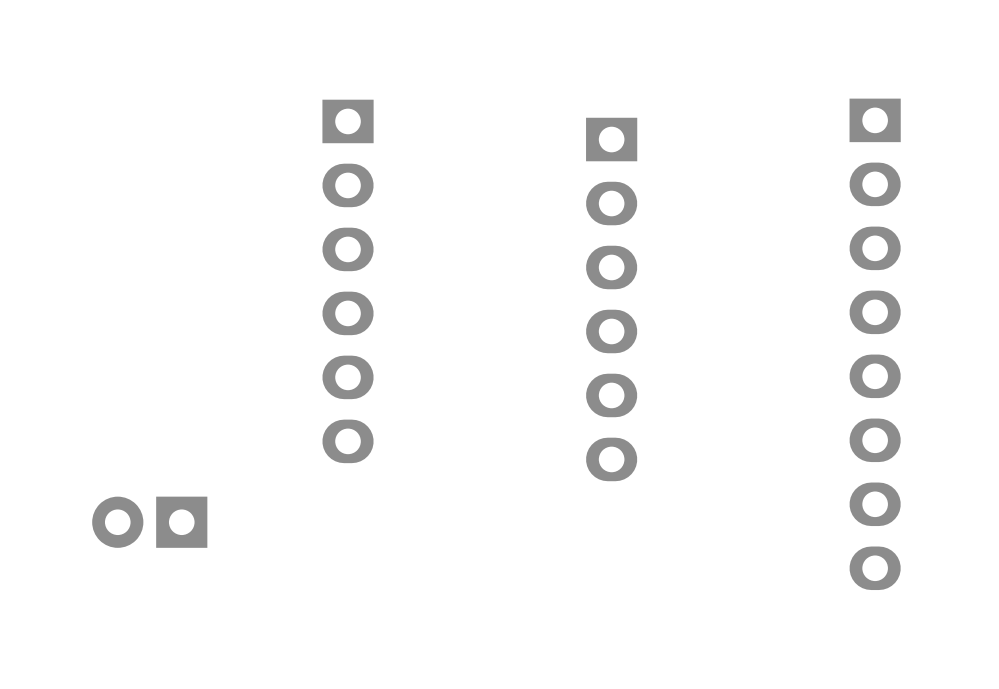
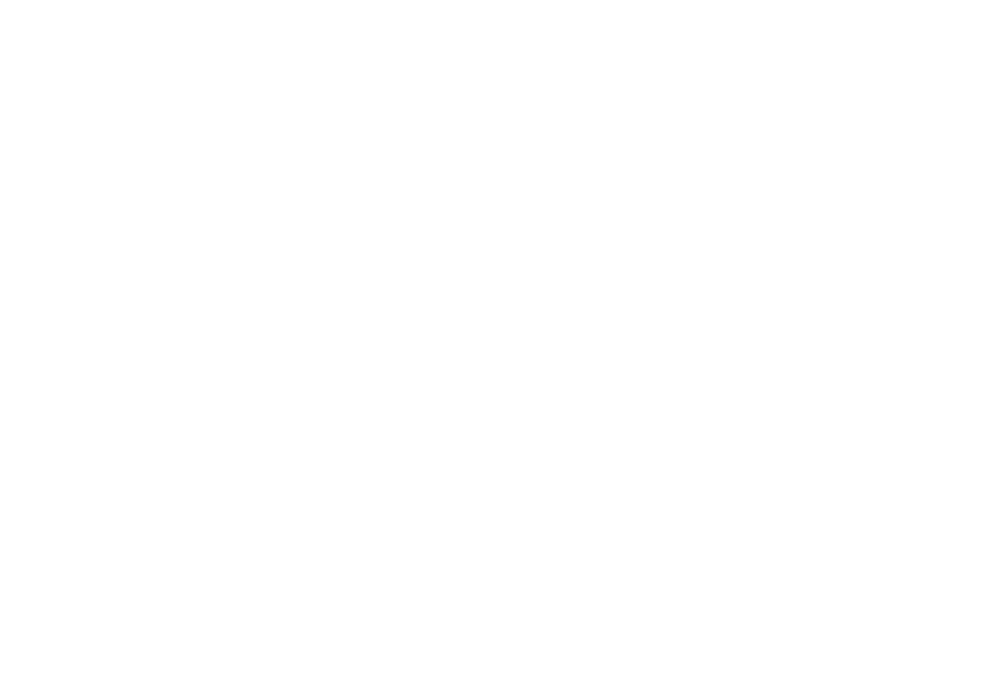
part: (348, 281) -> none
part: (611, 299) -> none
part: (875, 344) -> none
part: (149, 522) -> none

